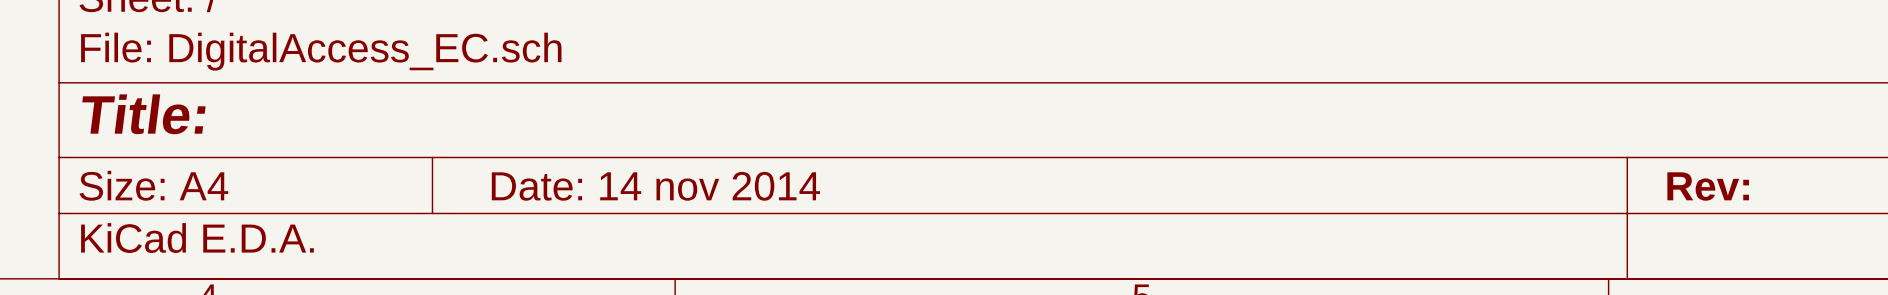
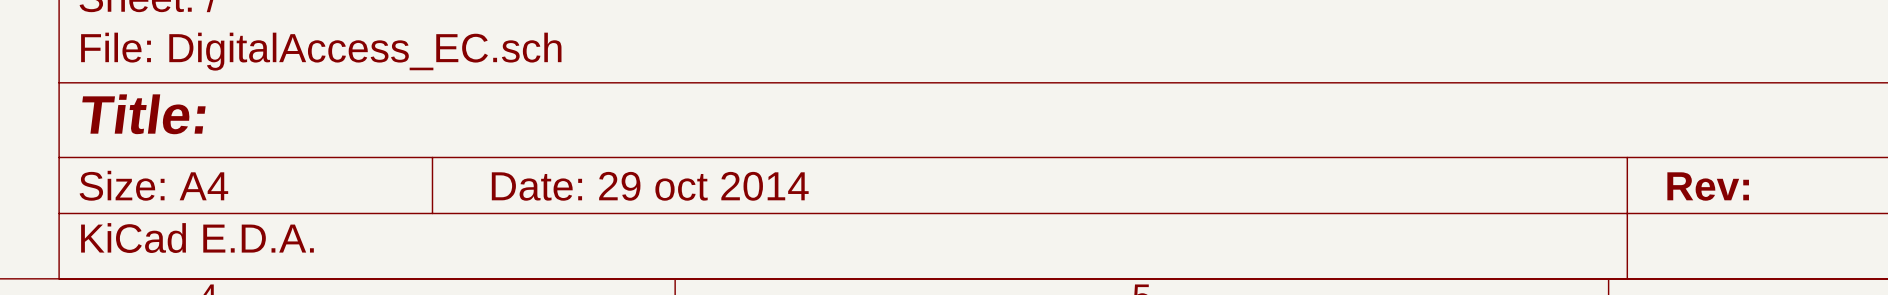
title block: Date: 14 nov 2014 (655, 186) -> Date: 29 oct 2014 (650, 186)

